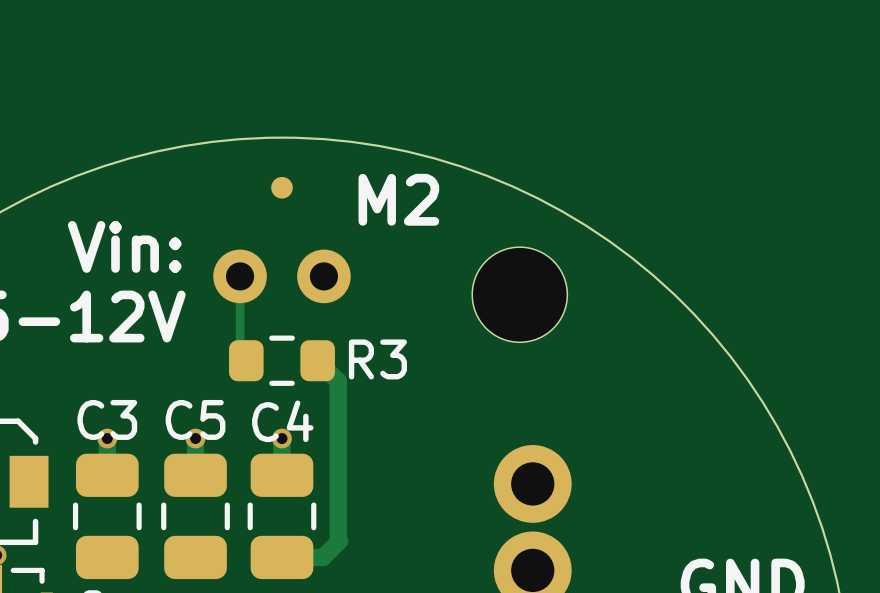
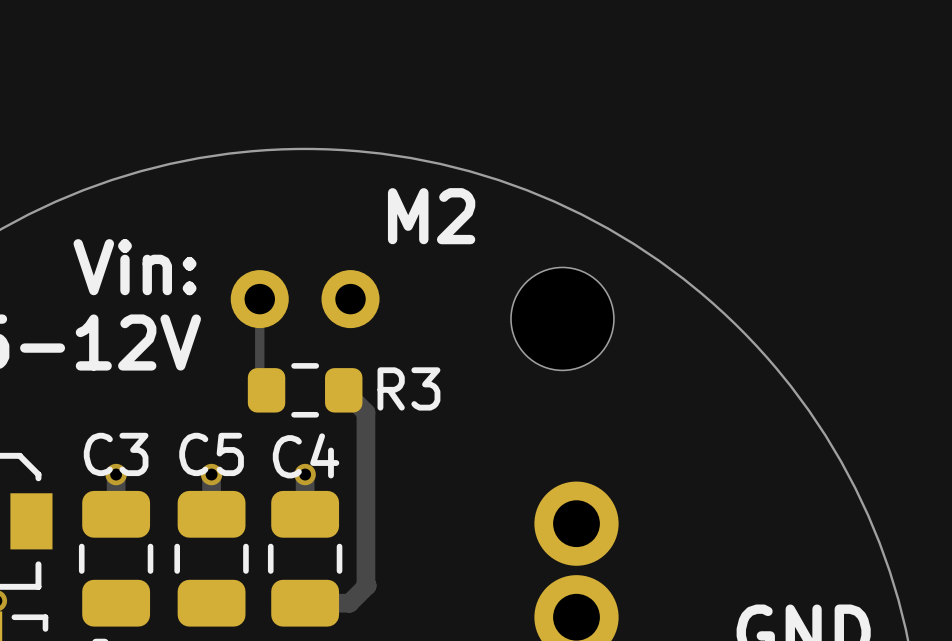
part: (281, 187) -> none

